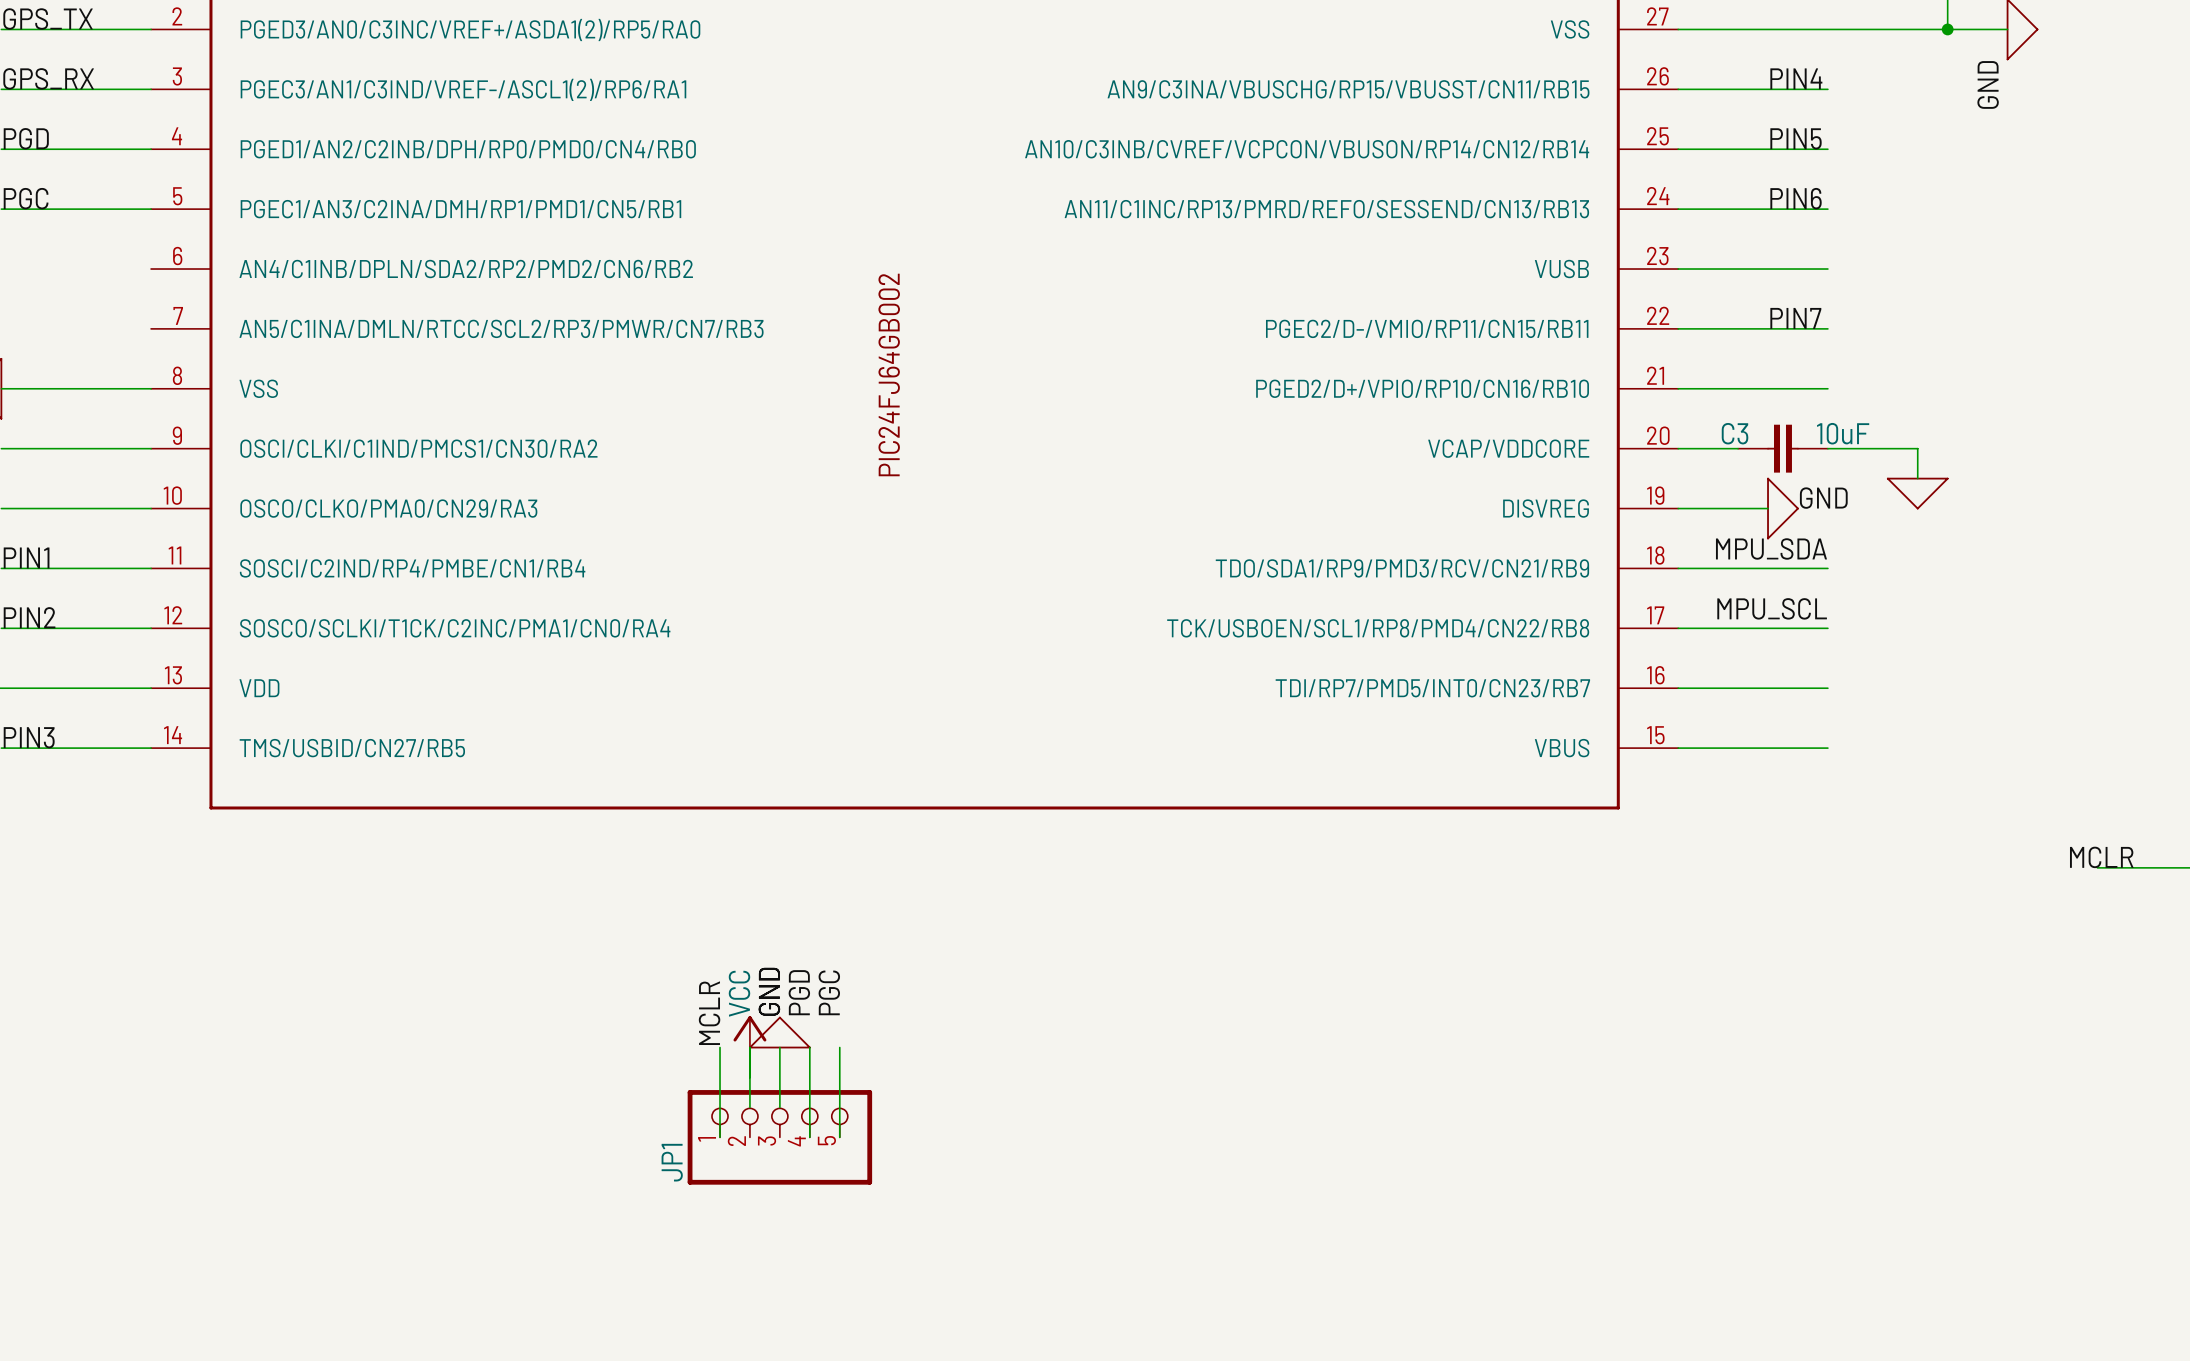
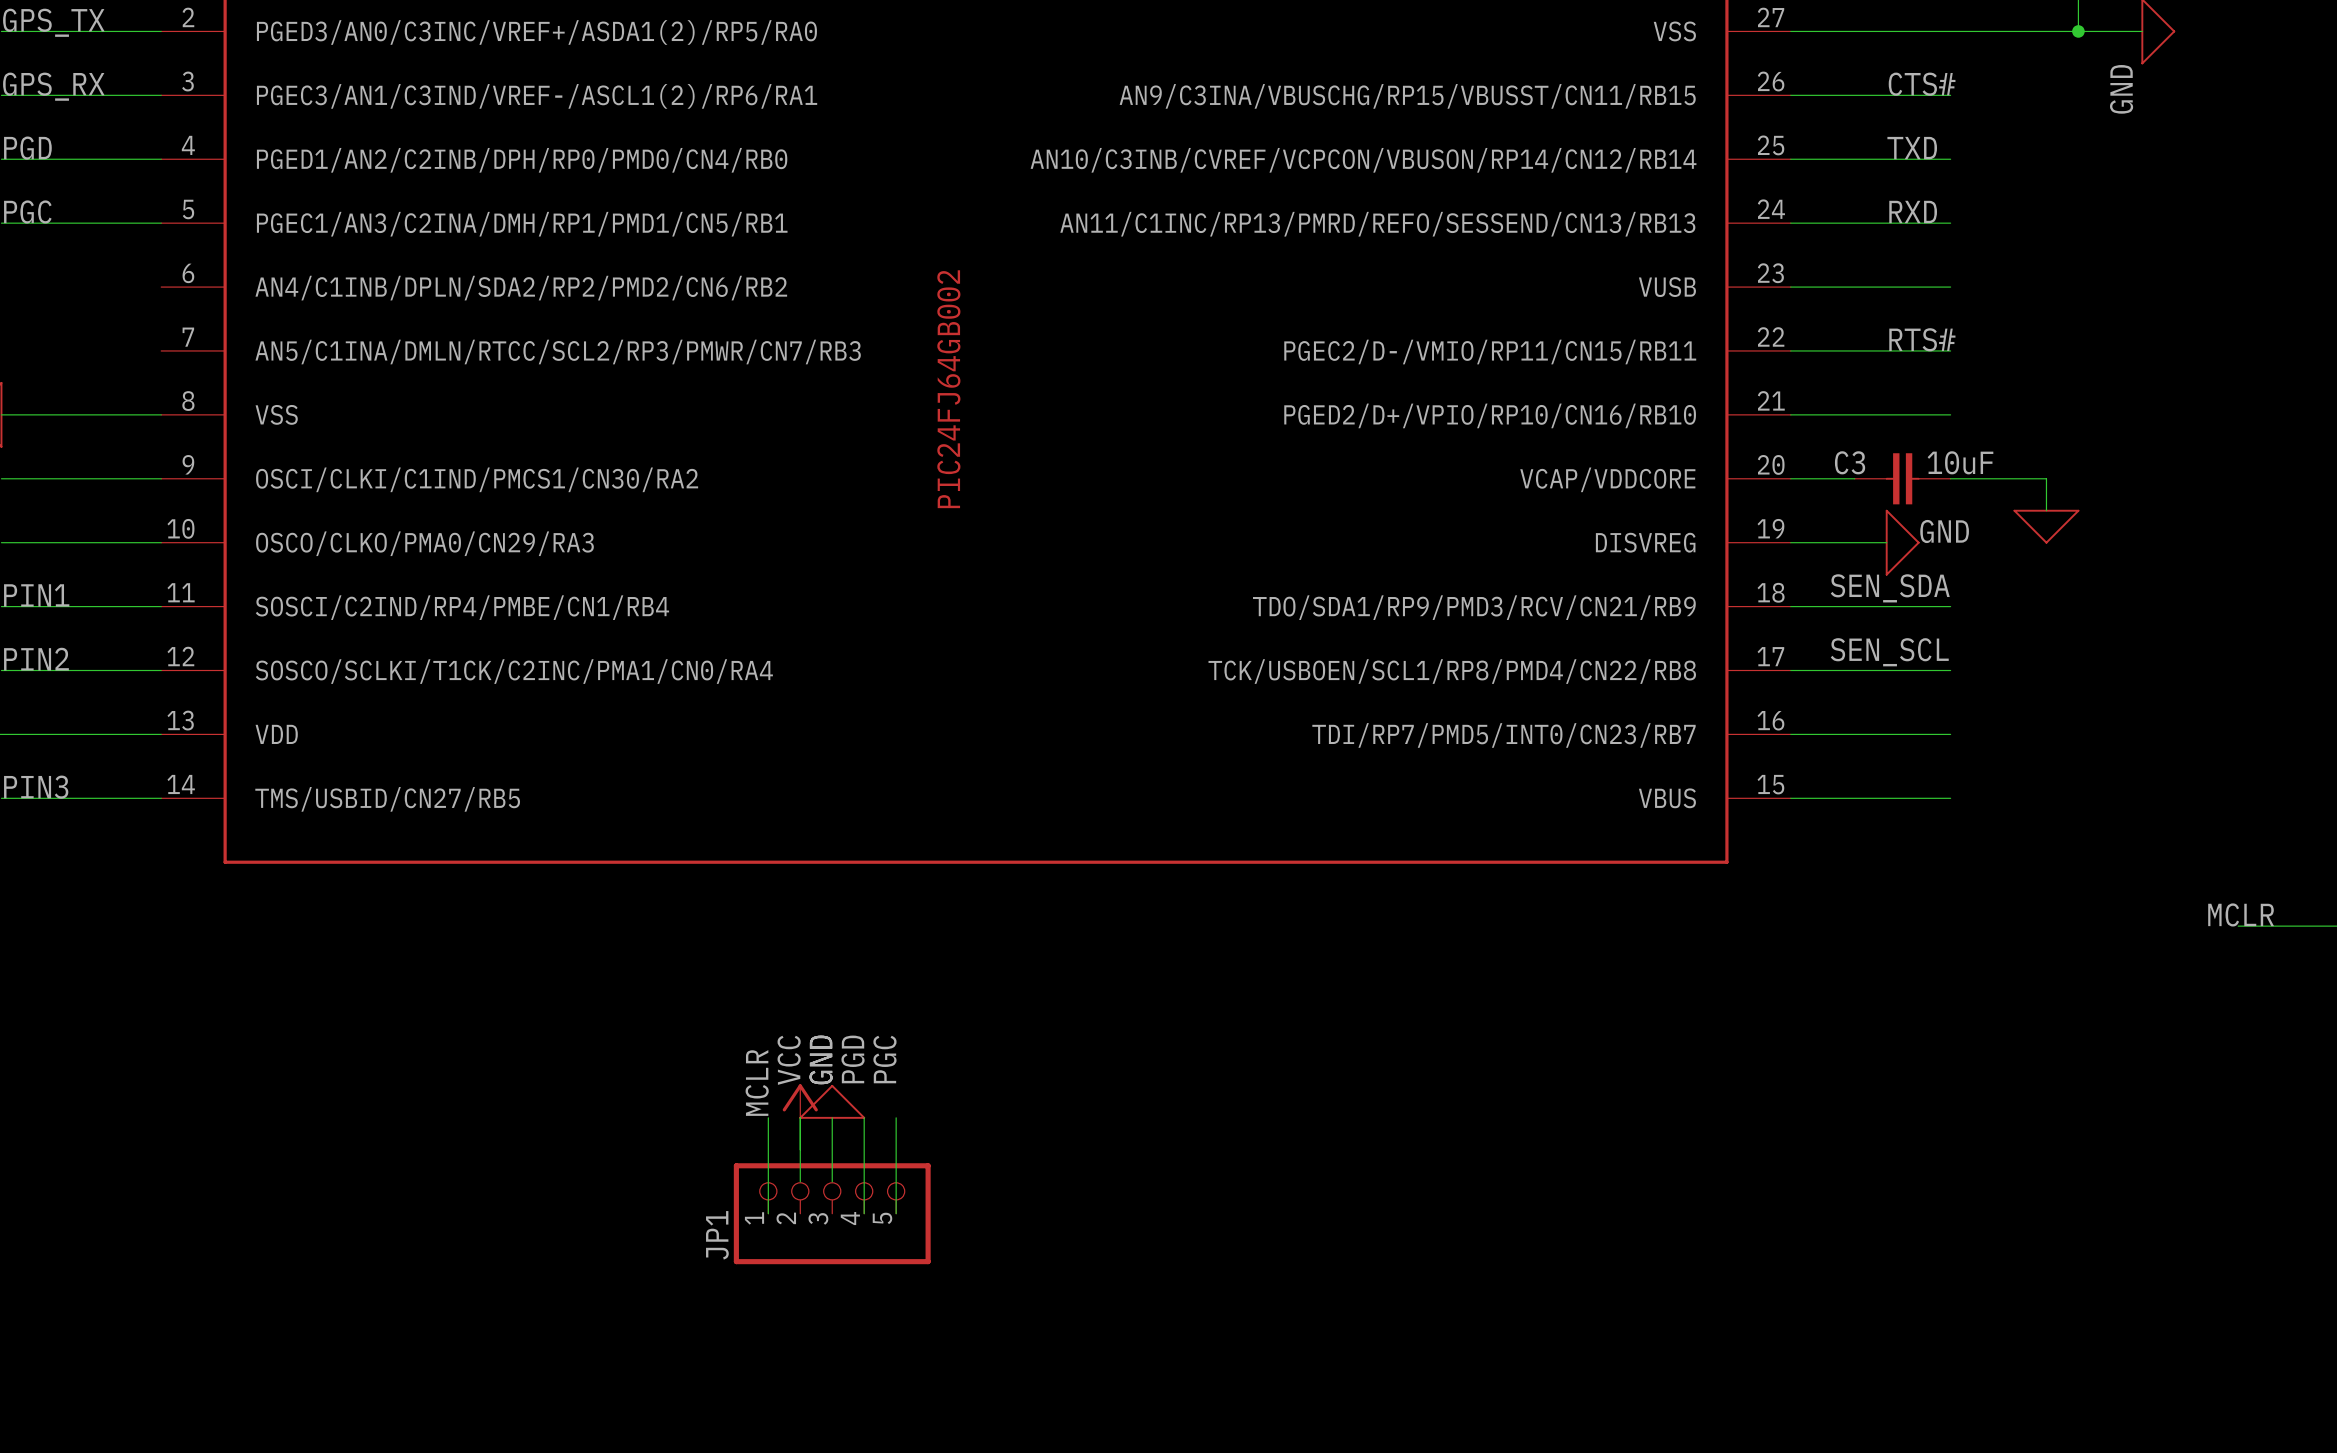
label: PIN4 (1796, 78) -> CTS# (1922, 84)
label: PIN5 (1796, 138) -> TXD (1912, 148)
label: PIN6 (1796, 198) -> RXD (1913, 211)
label: PIN7 (1795, 318) -> RTS# (1922, 339)
label: MPU_SDA (1771, 548) -> SEN_SDA (1890, 588)
label: MPU_SCL (1772, 608) -> SEN_SCL (1889, 652)

